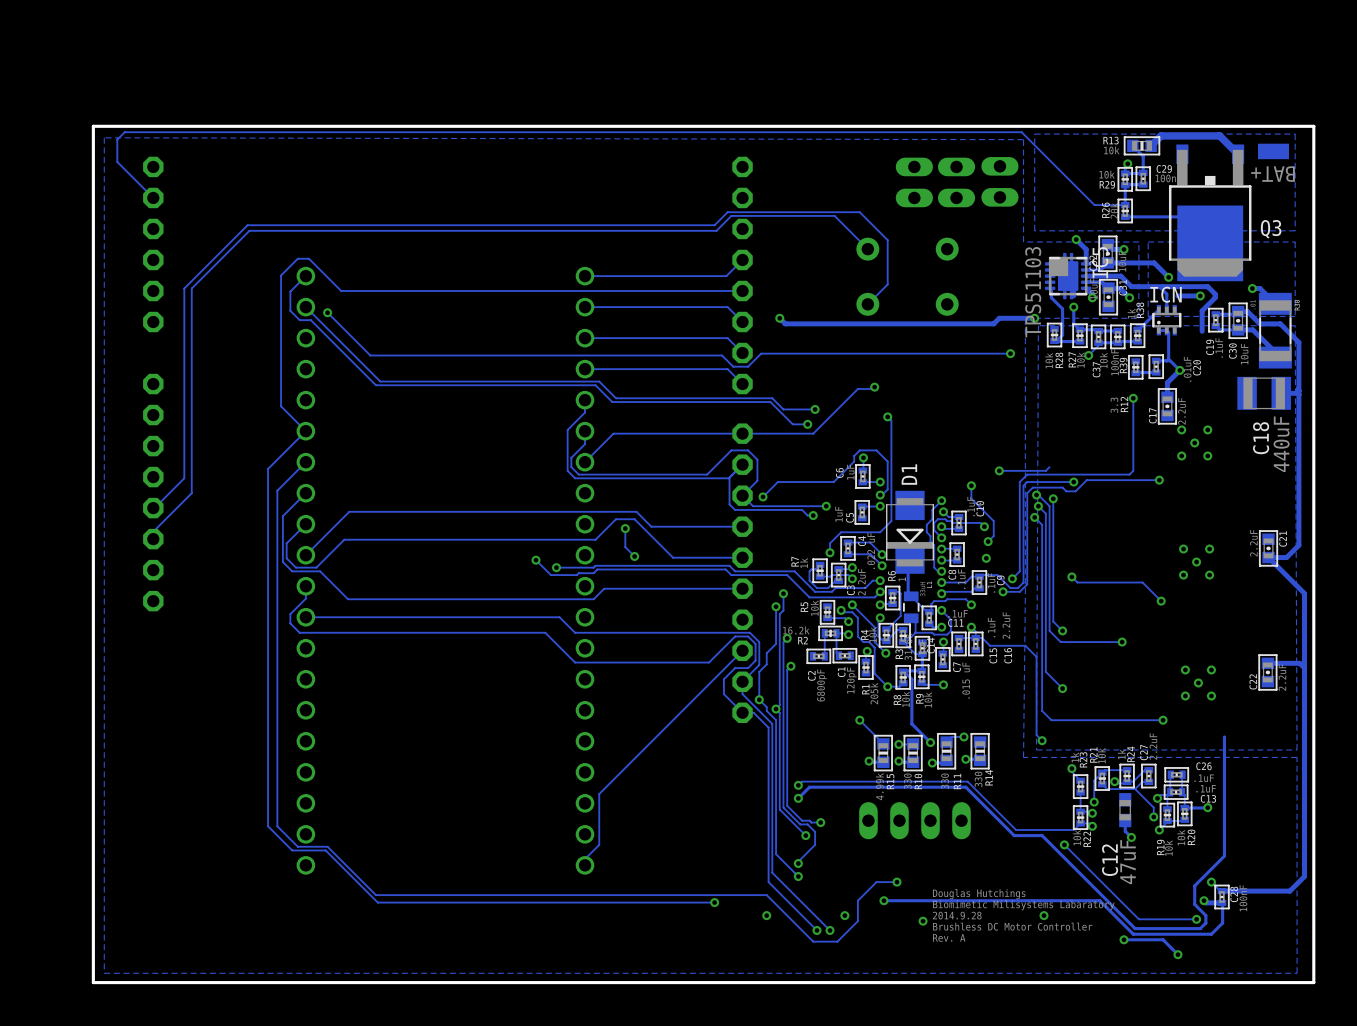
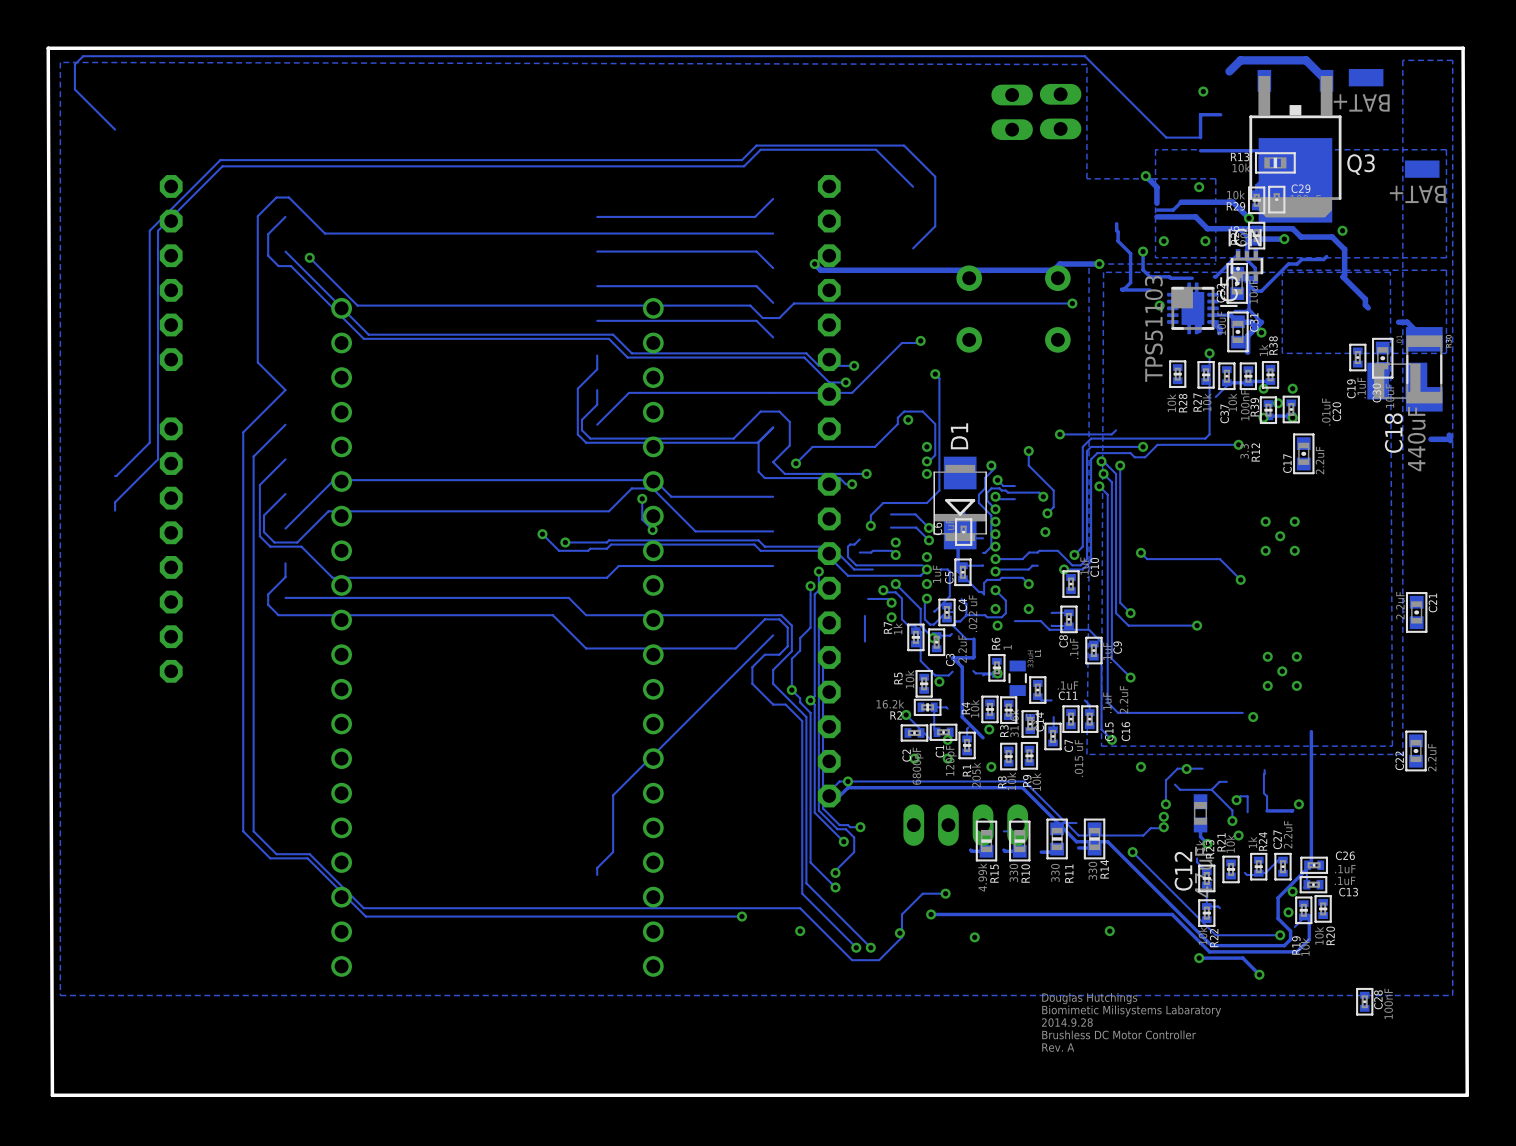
part: none -> BAT+ (1366, 77)
via: none -> (1203, 91)
part: none -> (1060, 111)
part: none -> (1012, 112)
board edge: (1313, 126) (93, 126) (93, 982) (1313, 982) (1313, 126) -> (1463, 48) (1467, 1095) (52, 1095) (48, 48) (1463, 48)
zone outline: (104, 137) (1023, 139) (1023, 241) (1138, 241) (1138, 318) (1025, 318) (1023, 757) (1297, 757) (1297, 973) (104, 973) (104, 137) -> (1452, 60) (1452, 995) (60, 995) (60, 62) (1086, 64) (1086, 178) (1215, 178) (1215, 264) (1089, 264) (1086, 754) (1402, 754) (1402, 60) (1452, 60)
Q3 footprint: [1168, 144, 1252, 282] -> [1249, 69, 1342, 223]
track: (1151, 145) (1161, 135) (1219, 135) (1238, 154) -> (1229, 71) (1240, 60) (1306, 60) (1326, 80)
via: none -> (1145, 176)
via: (1127, 163) -> none
via: none -> (1199, 187)
part: (999, 181) -> none
part: (914, 182) -> none
part: (956, 182) -> none
track: (1143, 184) (1125, 184) (1125, 205) (1094, 205) (1021, 132) (124, 132) (117, 139) (117, 161) (153, 197) -> (1220, 114) (1200, 114) (1200, 137) (1166, 137) (1084, 56) (83, 56) (74, 64) (74, 89) (115, 129)
track: none -> (1156, 216) (1195, 216) (1207, 228) (1292, 228) (1301, 237) (1332, 237) (1344, 249) (1343, 277) (1365, 299) (1365, 305) (1368, 307)
via: none -> (1249, 218)
track: none -> (1242, 228) (1240, 230) (1246, 237) (1246, 259) (1255, 268) (1255, 277)
via: none -> (1342, 230)
via: none -> (1284, 239)
via: none -> (1163, 241)
via: none -> (1205, 241)
track: (1125, 216) (1183, 216) (1210, 243) -> (1200, 150) (1265, 150) (1295, 180)
track: none -> (913, 248) (935, 226) (935, 176) (904, 145) (756, 145) (741, 160) (220, 160) (149, 230) (149, 442) (115, 475)
track: (534, 225) (247, 225) (184, 288) (184, 478) (153, 508) -> none
track: (677, 225) (714, 225) (727, 212) (859, 212) (887, 240) (887, 284) (867, 304) -> (756, 251) (773, 268)
via: none -> (1143, 251)
track: none -> (1326, 256) (1323, 259) (1301, 259) (1297, 264) (1288, 264) (1261, 291) (1255, 291) (1249, 284)
via: none -> (309, 257)
via: none -> (814, 264)
via: none -> (1099, 264)
track: (1076, 239) (1086, 249) (1086, 263) -> (1145, 176) (1156, 187) (1156, 203)
via: (1076, 239) -> none
track: (867, 249) (834, 215) (731, 215) (716, 230) (249, 230) (191, 288) (191, 493) (153, 531) (153, 539) -> (913, 186) (876, 149) (760, 149) (744, 166) (222, 166) (158, 230) (158, 459) (115, 502) (115, 510)
via: (1124, 249) -> none
track: (742, 259) (726, 276) (585, 276) -> (773, 198) (755, 216) (597, 216)
track: (1086, 270) (1100, 270) (1107, 262) (1154, 262) (1168, 277) -> (1156, 210) (1173, 210) (1181, 202) (1232, 202) (1249, 218)
via: none -> (1072, 303)
via: none -> (1159, 305)
track: (305, 276) (290, 291) (290, 310) (299, 320) (310, 320) (375, 385) (595, 385) (612, 402) (770, 402) (792, 424) (807, 424) -> (285, 216) (268, 234) (268, 255) (278, 266) (291, 266) (363, 338) (608, 338) (627, 357) (804, 357) (829, 382) (845, 382)
track: (1086, 276) (1120, 276) (1131, 286) (1207, 286) (1215, 294) (1215, 297) (1202, 310) (1202, 331) -> none
via: (1168, 277) -> none
track: (1050, 282) (1051, 297) (1062, 308) (1062, 335) (1054, 340) (1079, 341) -> (1116, 223) (1118, 241) (1130, 253) (1130, 282) (1121, 289) (1149, 290)
track: (1163, 286) (1161, 288) (1166, 294) (1166, 309) -> none
via: (1252, 288) -> none
track: (742, 290) (341, 290) (308, 258) (297, 258) (281, 275) (281, 406) (305, 431) (268, 469) (268, 826) (292, 850) (325, 850) (377, 902) (714, 902) -> (773, 233) (324, 233) (288, 197) (276, 197) (257, 216) (257, 362) (285, 390) (243, 432) (243, 831) (270, 858) (307, 858) (365, 916) (741, 916)
track: (1200, 295) (1177, 295) -> (1284, 239) (1259, 239)
via: (1200, 295) -> none
via: (1092, 297) -> none
track: none -> (920, 340) (918, 342) (902, 342) (852, 392) (629, 392) (597, 424)
via: none -> (920, 340)
track: (1074, 306) (1073, 323) (1079, 329) (1117, 331) -> (1143, 250) (1143, 269) (1149, 276) (1192, 278)
track: (305, 307) (380, 381) (599, 381) (616, 398) (772, 398) (783, 409) (815, 409) -> (285, 251) (368, 334) (613, 334) (631, 353) (806, 353) (818, 365) (854, 365)
track: (585, 307) (727, 307) (742, 322) -> none
via: (1073, 307) -> none
track: (1158, 309) (1137, 329) -> (1238, 254) (1214, 276)
track: (327, 312) (370, 355) (722, 355) (733, 366) (748, 366) (761, 353) (1010, 353) -> (309, 257) (357, 305) (750, 305) (762, 318) (779, 318) (793, 303) (1072, 303)
via: (327, 312) -> none
track: (1215, 314) (1235, 314) (1238, 311) (1247, 311) (1259, 323) (1280, 323) (1298, 342) (1298, 545) (1286, 557) (1268, 557) (1304, 593) (1304, 876) (1289, 891) (1220, 891) (1211, 882) -> none
via: none -> (1209, 353)
via: (779, 318) -> none
track: (1034, 318) (999, 318) (993, 323) (785, 323) (779, 318) -> (1099, 264) (1059, 264) (1053, 270) (820, 270) (814, 264)
via: (1034, 318) -> none
ICN position: (1166, 320) -> (1246, 266)
zone outline: (1295, 325) (1038, 325) (1036, 749) (1297, 749) (1295, 325) -> (1390, 272) (1103, 272) (1101, 746) (1392, 746) (1390, 272)
track: (1215, 326) (1219, 329) (1252, 329) (1272, 349) (1272, 355) (1275, 357) -> none
via: none -> (854, 365)
track: (1158, 330) (1168, 332) (1168, 358) (1166, 360) -> (1238, 277) (1246, 277) (1249, 279) (1249, 309) (1246, 311)
via: none -> (935, 374)
track: (585, 338) (727, 338) (742, 353) -> (597, 286) (756, 286) (773, 302)
via: none -> (845, 382)
via: none -> (1263, 388)
via: none -> (1292, 388)
track: none -> (597, 390) (597, 404) (581, 419) (581, 430) (590, 438) (733, 438) (760, 411) (779, 411) (789, 421) (789, 445) (773, 462) (784, 473) (866, 473)
via: (1010, 353) -> none
via: (1088, 355) -> none
track: (1156, 360) (1170, 360) (1179, 370) (1167, 382) (1167, 397) -> (1235, 311) (1250, 311) (1261, 322) (1247, 336) (1247, 352)
via: none -> (1278, 403)
track: (585, 369) (727, 369) (742, 384) -> (597, 320) (756, 320) (773, 337)
via: (1179, 370) -> none
via: none -> (1263, 417)
via: none -> (1292, 417)
via: none -> (908, 419)
track: (874, 387) (872, 389) (857, 389) (813, 433) (763, 433) -> none
via: (874, 387) -> none
via: none -> (1059, 434)
C18 position: (1264, 393) -> (1397, 381)
via: none -> (1238, 444)
track: (1133, 398) (1133, 470) (1129, 474) (1027, 474) (1019, 482) (1019, 571) (1012, 578) -> (1209, 353) (1209, 434) (1205, 438) (1091, 438) (1082, 446) (1082, 546) (1074, 554)
via: (1133, 398) -> none
track: (585, 400) (585, 412) (567, 429) (567, 470) (575, 478) (728, 478) (742, 464) -> (597, 355) (597, 369) (577, 388) (577, 434) (586, 442) (757, 442) (773, 427)
via: none -> (926, 446)
via: none -> (1143, 446)
via: none -> (1028, 451)
via: (815, 409) -> none
track: none -> (926, 461) (935, 455) (935, 424) (922, 411) (904, 411) (897, 417) (897, 424) (874, 446) (812, 446) (796, 463)
via: none -> (926, 461)
via: none -> (1101, 461)
via: none -> (796, 463)
track: (887, 416) (891, 420) (891, 521) (880, 532) (841, 532) (830, 543) (830, 552) -> (935, 374) (939, 378) (939, 490) (926, 503) (883, 503) (870, 515) (870, 525)
via: none -> (1120, 465)
via: none -> (866, 473)
via: (807, 424) -> none
via: none -> (926, 473)
via: none -> (1103, 473)
via: none -> (997, 480)
via: (1181, 429) -> none
via: (1207, 429) -> none
track: (585, 431) (585, 444) (571, 457) (571, 467) (578, 474) (707, 474) (731, 450) (748, 450) (757, 459) (757, 480) (742, 495) (753, 506) (766, 506) -> (859, 539) (854, 544) (847, 546) (847, 557) (856, 565)
track: (757, 433) (613, 433) (585, 462) -> (845, 484) (839, 478) (764, 478) (758, 471) (758, 442)
via: none -> (852, 484)
via: none -> (1099, 486)
via: (1194, 442) -> none
via: none -> (995, 496)
via: none -> (1043, 496)
via: none -> (642, 498)
track: (876, 450) (859, 450) (854, 455) (854, 461) (833, 482) (777, 482) (763, 496) -> (978, 503) (978, 494) (985, 488) (985, 478) (995, 467)
via: none -> (995, 509)
via: (1181, 455) -> none
via: (1207, 455) -> none
via: (863, 457) -> none
via: none -> (1047, 513)
track: (305, 462) (277, 490) (277, 826) (297, 846) (327, 846) (375, 895) (766, 895) (813, 941) (837, 941) (857, 921) (857, 900) (876, 882) (896, 882) -> (285, 424) (253, 456) (253, 831) (276, 854) (309, 854) (363, 908) (800, 908) (852, 960) (879, 960) (902, 937) (902, 914) (922, 893) (945, 893)
via: none -> (995, 521)
track: (1049, 467) (1045, 470) (999, 470) -> (1116, 430) (1111, 434) (1059, 434)
via: none -> (1265, 521)
via: none -> (1294, 521)
via: none -> (870, 525)
via: (999, 470) -> none
via: none -> (929, 527)
via: none -> (652, 530)
via: none -> (1045, 532)
track: (729, 477) (729, 504) (735, 509) (764, 509) -> (565, 542) (606, 542) (608, 540) (758, 540) (764, 546) (831, 546) (854, 569)
via: none -> (542, 534)
via: none -> (995, 534)
via: none -> (1280, 536)
track: (1159, 480) (1086, 480) (1075, 491) (1066, 491) (1062, 487) (1032, 487) (1027, 493) (1027, 584) (1019, 591) (1003, 591) -> (1238, 444) (1157, 444) (1145, 457) (1134, 457) (1130, 453) (1097, 453) (1091, 459) (1091, 561) (1082, 569) (1064, 569)
via: (1159, 480) -> none
via: (880, 482) -> none
track: (1073, 482) (1027, 482) (1023, 485) (1023, 582) (1017, 588) (1010, 588) (997, 575) (971, 576) (965, 582) (941, 582) -> (1143, 446) (1091, 446) (1086, 451) (1086, 559) (1080, 565) (1072, 565) (1057, 550) (1029, 552) (1022, 559) (995, 559)
via: (1073, 482) -> none
via: none -> (929, 540)
via: none -> (565, 542)
via: none -> (895, 542)
track: (971, 485) (971, 498) (993, 521) (993, 536) (988, 541) -> (1028, 451) (1028, 465) (1053, 490) (1053, 507) (1047, 513)
via: (971, 485) -> none
via: none -> (995, 546)
track: (305, 493) (282, 516) (282, 562) (292, 571) (320, 571) (348, 599) (593, 599) (604, 588) (742, 588) -> (285, 459) (259, 484) (259, 536) (270, 546) (301, 546) (332, 577) (606, 577) (618, 566) (773, 566)
via: none -> (1265, 550)
via: none -> (1294, 550)
via: (880, 495) -> none
via: none -> (1140, 552)
track: (1036, 495) (1049, 506) (1049, 630) (1060, 642) (1122, 642) -> (1101, 461) (1116, 473) (1116, 613) (1128, 625) (1197, 625)
via: (1036, 495) -> none
via: (763, 496) -> none
via: none -> (895, 554)
via: none -> (1074, 554)
via: none -> (926, 557)
track: (1053, 498) (1053, 621) (1062, 630) -> (1120, 465) (1120, 602) (1130, 613)
via: (1053, 498) -> none
via: none -> (995, 559)
track: (941, 500) (932, 509) (932, 519) (926, 524) (926, 532) (934, 545) (934, 567) (937, 571) (941, 571) -> none
via: (941, 500) -> none
via: (826, 506) -> none
via: (880, 506) -> none
track: (1038, 506) (1045, 513) (1045, 671) (1062, 688) -> (1103, 473) (1111, 482) (1111, 658) (1130, 677)
via: (1038, 506) -> none
track: (781, 509) (802, 509) (807, 515) -> (542, 534) (559, 550) (606, 548) (611, 544) (754, 544) (760, 550) (823, 550) (847, 575) (902, 575)
track: none -> (926, 569) (920, 575) (908, 575)
via: none -> (926, 569)
via: none -> (1064, 569)
via: none -> (818, 571)
via: none -> (995, 571)
track: (943, 511) (948, 517) (959, 517) -> (997, 480) (1003, 486) (1014, 486)
via: (943, 511) -> none
via: (813, 515) -> none
track: (1034, 517) (1042, 524) (1042, 710) (1051, 720) (1163, 720) -> (1099, 486) (1107, 494) (1107, 702) (1118, 712) (1242, 712)
via: (1034, 517) -> none
via: none -> (1240, 579)
via: none -> (895, 584)
via: none -> (926, 584)
via: none -> (1028, 584)
track: (305, 524) (286, 543) (286, 558) (295, 567) (316, 567) (344, 539) (595, 539) (616, 519) (634, 519) (673, 557) (742, 557) -> (285, 494) (264, 515) (264, 532) (274, 542) (297, 542) (328, 511) (608, 511) (631, 488) (652, 488) (695, 531) (773, 531)
via: none -> (810, 586)
track: (742, 526) (651, 526) (636, 511) (349, 511) (305, 555) -> (773, 496) (671, 496) (654, 480) (333, 480) (285, 528)
track: (941, 526) (943, 528) (959, 528) -> (995, 496) (997, 499) (1014, 499)
via: (941, 526) -> none
track: (984, 526) (980, 522) (952, 522) (945, 519) (937, 519) (934, 522) (934, 530) (941, 537) -> (1043, 496) (1039, 492) (1007, 492) (999, 488) (991, 488) (987, 492) (987, 500) (995, 509)
via: (984, 526) -> none
track: (625, 528) (625, 547) (634, 556) -> (642, 498) (642, 519) (652, 530)
via: (625, 528) -> none
via: none -> (883, 590)
via: none -> (995, 590)
D1 position: (910, 532) -> (960, 503)
via: none -> (926, 598)
via: (941, 537) -> none
via: none -> (891, 602)
via: (988, 541) -> none
track: (847, 542) (870, 542) (882, 554) -> (890, 514) (915, 514) (929, 527)
via: none -> (995, 608)
via: none -> (1028, 608)
via: (941, 549) -> none
via: none -> (1130, 613)
via: (1183, 549) -> none
via: (1209, 549) -> none
via: none -> (891, 617)
via: (830, 552) -> none
track: (847, 554) (870, 554) (882, 565) -> (890, 527) (916, 527) (929, 540)
via: (882, 554) -> none
via: (634, 556) -> none
track: none -> (1014, 621) (1040, 621) (1049, 629) (1089, 629) (1101, 642) (1101, 729) (1111, 739)
via: (986, 558) -> none
track: (910, 559) (908, 561) (908, 593) (926, 611) (931, 614) (931, 603) (934, 601) (965, 599) (971, 604) -> (960, 533) (958, 535) (958, 571) (979, 592) (984, 594) (984, 583) (987, 579) (1022, 577) (1028, 584)
track: (536, 560) (550, 575) (593, 573) (597, 569) (725, 569) (731, 575) (787, 575) (809, 597) (874, 597) (880, 591) -> none
via: (536, 560) -> none
via: none -> (997, 625)
via: (941, 560) -> none
via: (1196, 562) -> none
track: (820, 564) (815, 569) (809, 571) (809, 580) (816, 588) (828, 588) (835, 580) (838, 580) -> none
via: (882, 565) -> none
track: (556, 567) (729, 565) (735, 571) (794, 571) (815, 591) (831, 591) (835, 588) (865, 588) (872, 580) (880, 580) -> none
via: (556, 567) -> none
via: (852, 567) -> none
via: none -> (933, 638)
via: (941, 571) -> none
via: (1183, 575) -> none
via: (1209, 575) -> none
track: (820, 576) (848, 575) (852, 578) -> (859, 552) (891, 550) (895, 554)
track: (1071, 576) (1077, 582) (1142, 582) (1161, 601) -> (1140, 552) (1147, 559) (1219, 559) (1240, 579)
via position: (1071, 576) -> (1197, 625)
via: (852, 578) -> none
via: (1012, 578) -> none
via: (880, 580) -> none
via: (941, 582) -> none
track: (305, 586) (305, 598) (290, 614) (290, 623) (299, 632) (545, 632) (575, 662) (709, 662) (735, 636) (748, 636) (755, 643) (755, 660) (748, 668) (735, 668) (723, 679) (723, 694) (742, 712) (753, 712) (768, 727) (768, 882) (816, 930) (815, 930) -> (285, 563) (285, 577) (268, 594) (268, 604) (278, 615) (552, 615) (586, 648) (735, 648) (764, 619) (779, 619) (787, 627) (787, 646) (779, 654) (764, 654) (752, 667) (752, 683) (773, 704) (785, 704) (802, 721) (802, 893) (856, 947) (854, 947)
track: (979, 588) (974, 588) (971, 591) (943, 591) (941, 593) -> (1037, 565) (1032, 565) (1028, 569) (997, 569) (995, 571)
via: none -> (1267, 656)
via: none -> (1296, 656)
via: (880, 591) -> none
via: (1003, 591) -> none
track: (892, 592) (900, 593) (900, 616) (886, 629) -> (940, 569) (947, 569) (949, 571) (949, 596) (933, 611)
track: (783, 593) (783, 610) (779, 614) (779, 705) (776, 709) (779, 712) (779, 809) (805, 835) -> (818, 571) (818, 590) (814, 594) (814, 696) (810, 700) (814, 704) (814, 812) (843, 841)
via: (783, 593) -> none
via: (941, 593) -> none
via: none -> (1282, 671)
via: (1161, 601) -> none
via: none -> (997, 673)
track: (852, 604) (874, 627) (874, 642) (885, 653) -> (895, 584) (920, 608) (920, 625) (933, 638)
via: (852, 604) -> none
via: (880, 604) -> none
via: (971, 604) -> none
track: (776, 606) (776, 643) (766, 653) (766, 664) (759, 671) (759, 699) (776, 720) (776, 854) (798, 876) -> (810, 586) (810, 627) (800, 638) (800, 650) (791, 658) (791, 690) (810, 712) (810, 862) (835, 887)
via: (776, 606) -> none
via: none -> (1130, 677)
track: (841, 610) (843, 612) (852, 612) (857, 617) (857, 636) (863, 642) (869, 642) (874, 647) (874, 673) (887, 686) (899, 686) (903, 683) -> (883, 590) (885, 592) (895, 592) (902, 598) (902, 619) (908, 625) (914, 625) (920, 631) (920, 660) (935, 675) (948, 675) (952, 671)
track: (941, 610) (950, 619) (950, 630) (947, 634) (915, 632) -> (995, 590) (1005, 600) (1005, 613) (1001, 617) (966, 615)
via: (941, 610) -> none
via: none -> (1267, 685)
via: none -> (1296, 685)
track: (305, 617) (559, 617) (575, 632) (749, 632) (759, 642) (759, 665) (742, 681) (742, 694) (772, 723) (772, 872) (830, 930) (828, 930) -> (285, 597) (568, 597) (586, 615) (781, 615) (791, 625) (791, 651) (773, 669) (773, 683) (806, 717) (806, 883) (870, 947) (868, 947)
via: none -> (791, 690)
track: (880, 617) (878, 619) (878, 636) (883, 641) (886, 641) (897, 629) (903, 629) -> (926, 598) (924, 600) (924, 619) (930, 624) (933, 624) (946, 612) (952, 612)
via: (880, 617) -> none
track: (827, 618) (845, 618) (848, 621) -> (868, 598) (887, 598) (891, 602)
track: (911, 618) (915, 622) (915, 632) -> (961, 599) (966, 603) (966, 615)
via: (848, 621) -> none
via: none -> (810, 700)
via: (941, 627) -> none
via: (971, 627) -> none
via: (1062, 630) -> none
track: (915, 632) (903, 641) (915, 654) (922, 654) (922, 670) (903, 671) (911, 679) (911, 723) (930, 742) -> (966, 615) (952, 625) (966, 639) (974, 639) (974, 657) (952, 658) (962, 667) (962, 717) (983, 737)
track: (824, 633) (824, 656) -> (864, 615) (864, 641)
via: (848, 634) -> none
track: (787, 638) (783, 642) (783, 807) (800, 824) (807, 824) (815, 831) (815, 844) (798, 863) -> (823, 621) (818, 625) (818, 810) (837, 829) (845, 829) (854, 837) (854, 852) (835, 872)
via: (787, 638) -> none
track: (959, 638) (982, 638) (990, 645) (1025, 645) (1036, 656) (1036, 735) (1042, 740) -> none
track: none -> (906, 714) (930, 739)
via: none -> (906, 714)
via: (943, 642) -> none
track: (742, 650) (599, 794) (599, 844) (585, 859) (585, 865) -> (773, 635) (613, 795) (613, 852) (597, 868) (597, 874)
via: (867, 651) -> none
via: none -> (947, 739)
via: none -> (1111, 739)
track: (1267, 663) (1299, 663) (1304, 668) -> none
track: (790, 666) (787, 669) (787, 805) (802, 820) (820, 822) -> (827, 652) (823, 656) (823, 808) (839, 825) (860, 827)
via: (790, 666) -> none
via: (1185, 669) -> none
via: (1211, 669) -> none
via: none -> (914, 758)
via: none -> (947, 758)
track: (921, 682) (923, 684) (943, 684) -> (973, 670) (975, 673) (997, 673)
via: (1198, 683) -> none
via: (943, 684) -> none
via: none -> (1140, 766)
via: (1185, 696) -> none
via: (1211, 696) -> none
via: (776, 709) -> none
via: none -> (1236, 800)
track: (859, 720) (883, 743) -> none
via: (859, 720) -> none
via: none -> (1165, 804)
via: none -> (1163, 816)
via: none -> (1232, 820)
via: (963, 736) -> none
track: (1224, 736) (1224, 856) (1194, 885) (1194, 904) (1205, 915) (1205, 923) (1200, 928) (1135, 928) (1042, 835) (1014, 835) (965, 787) (809, 787) (798, 798) -> (1311, 731) (1311, 864) (1278, 897) (1278, 918) (1290, 931) (1290, 939) (1284, 945) (1211, 945) (1107, 841) (1076, 841) (1022, 787) (847, 787) (835, 800)
via: none -> (860, 827)
via: (930, 742) -> none
via: (898, 744) -> none
via: none -> (1238, 835)
via: none -> (843, 841)
via: (965, 759) -> none
via: (869, 761) -> none
via: (898, 761) -> none
via: (932, 763) -> none
via: none -> (1132, 852)
via position: (1071, 768) -> (1207, 843)
track: (1127, 770) (1104, 770) (1094, 780) (1094, 802) -> (1202, 768) (1177, 768) (1165, 780) (1165, 804)
track: (1182, 771) (1182, 792) (1184, 794) (1184, 807) (1207, 807) -> (1264, 770) (1263, 793) (1267, 796) (1267, 810) (1292, 810)
via: none -> (835, 872)
via: (1114, 781) -> none
track: (1148, 781) (1142, 781) (1135, 789) -> (1226, 781) (1219, 781) (1211, 789)
track: (1102, 784) (1106, 789) (1135, 789) -> (1174, 784) (1180, 789) (1211, 789)
track: (798, 785) (802, 781) (967, 781) (1016, 830) (1074, 830) (1080, 823) (1089, 823) (1092, 826) -> (835, 785) (839, 781) (1024, 781) (1078, 835) (1143, 835) (1150, 828) (1160, 828) (1163, 831)
via: (798, 785) -> none
track: (1135, 789) (1153, 807) (1153, 816) -> (1211, 789) (1232, 810) (1232, 820)
via: none -> (835, 887)
via: (798, 798) -> none
track: (1157, 798) (1160, 794) (1167, 794) (1167, 809) -> (1236, 800) (1240, 796) (1247, 796) (1247, 812)
via: none -> (945, 893)
via: (1094, 802) -> none
via: (1207, 807) -> none
C12 position: (1125, 810) -> (1200, 813)
via: (1092, 813) -> none
track: (1184, 819) (1171, 821) -> (931, 914) (1172, 914) (1209, 951) (1296, 951) (1309, 939) (1308, 916)
via: none -> (741, 916)
part position: (914, 820) -> (965, 825)
track: (1124, 821) (1125, 820) (1125, 831) (1131, 837) -> (1199, 826) (1200, 824) (1200, 836) (1207, 843)
via position: (820, 822) -> (931, 914)
via: (1092, 826) -> none
via: (1159, 830) -> none
via: none -> (800, 931)
via: none -> (1109, 931)
via: (1131, 837) -> none
via: none -> (1280, 935)
via: none -> (974, 937)
track: (1064, 844) (1138, 919) (1196, 919) -> (1132, 852) (1215, 935) (1280, 935)
via position: (1064, 844) -> (1199, 958)
via: none -> (856, 947)
via: none -> (870, 947)
via: (798, 863) -> none
via: none -> (1259, 974)
via: (798, 876) -> none
via: (896, 882) -> none
via: (1211, 882) -> none
track: (883, 900) (1099, 900) (1133, 934) (1211, 934) (1222, 923) (1222, 902) -> none
via: (883, 900) -> none
track: (1204, 900) (1206, 902) (1222, 902) -> none
via: (1204, 900) -> none
via: (714, 902) -> none
via: (766, 915) -> none
via: (844, 915) -> none
via: (1043, 915) -> none
via: (1196, 919) -> none
via: (923, 921) -> none
via: (816, 930) -> none
via: (830, 930) -> none
track: (1124, 939) (1163, 939) (1177, 954) -> (1199, 958) (1242, 958) (1259, 974)
via: (1124, 939) -> none
via: (1177, 954) -> none

